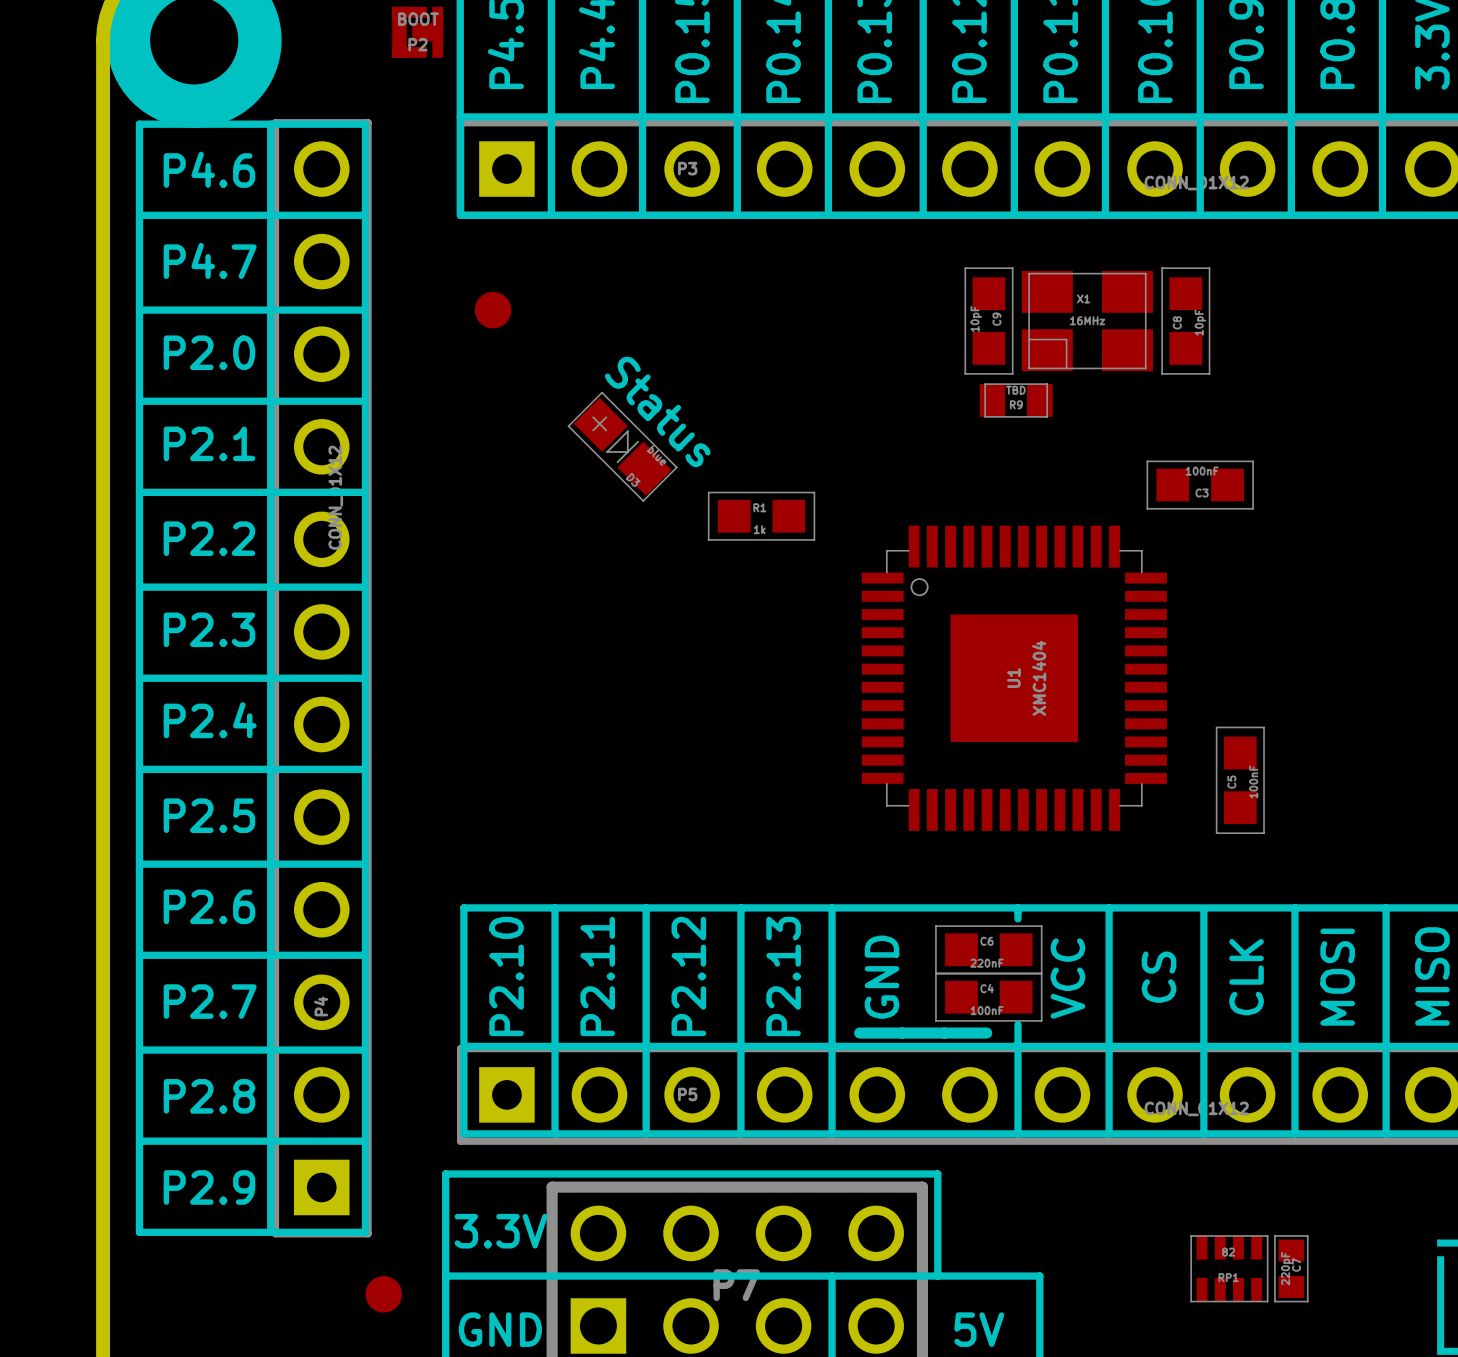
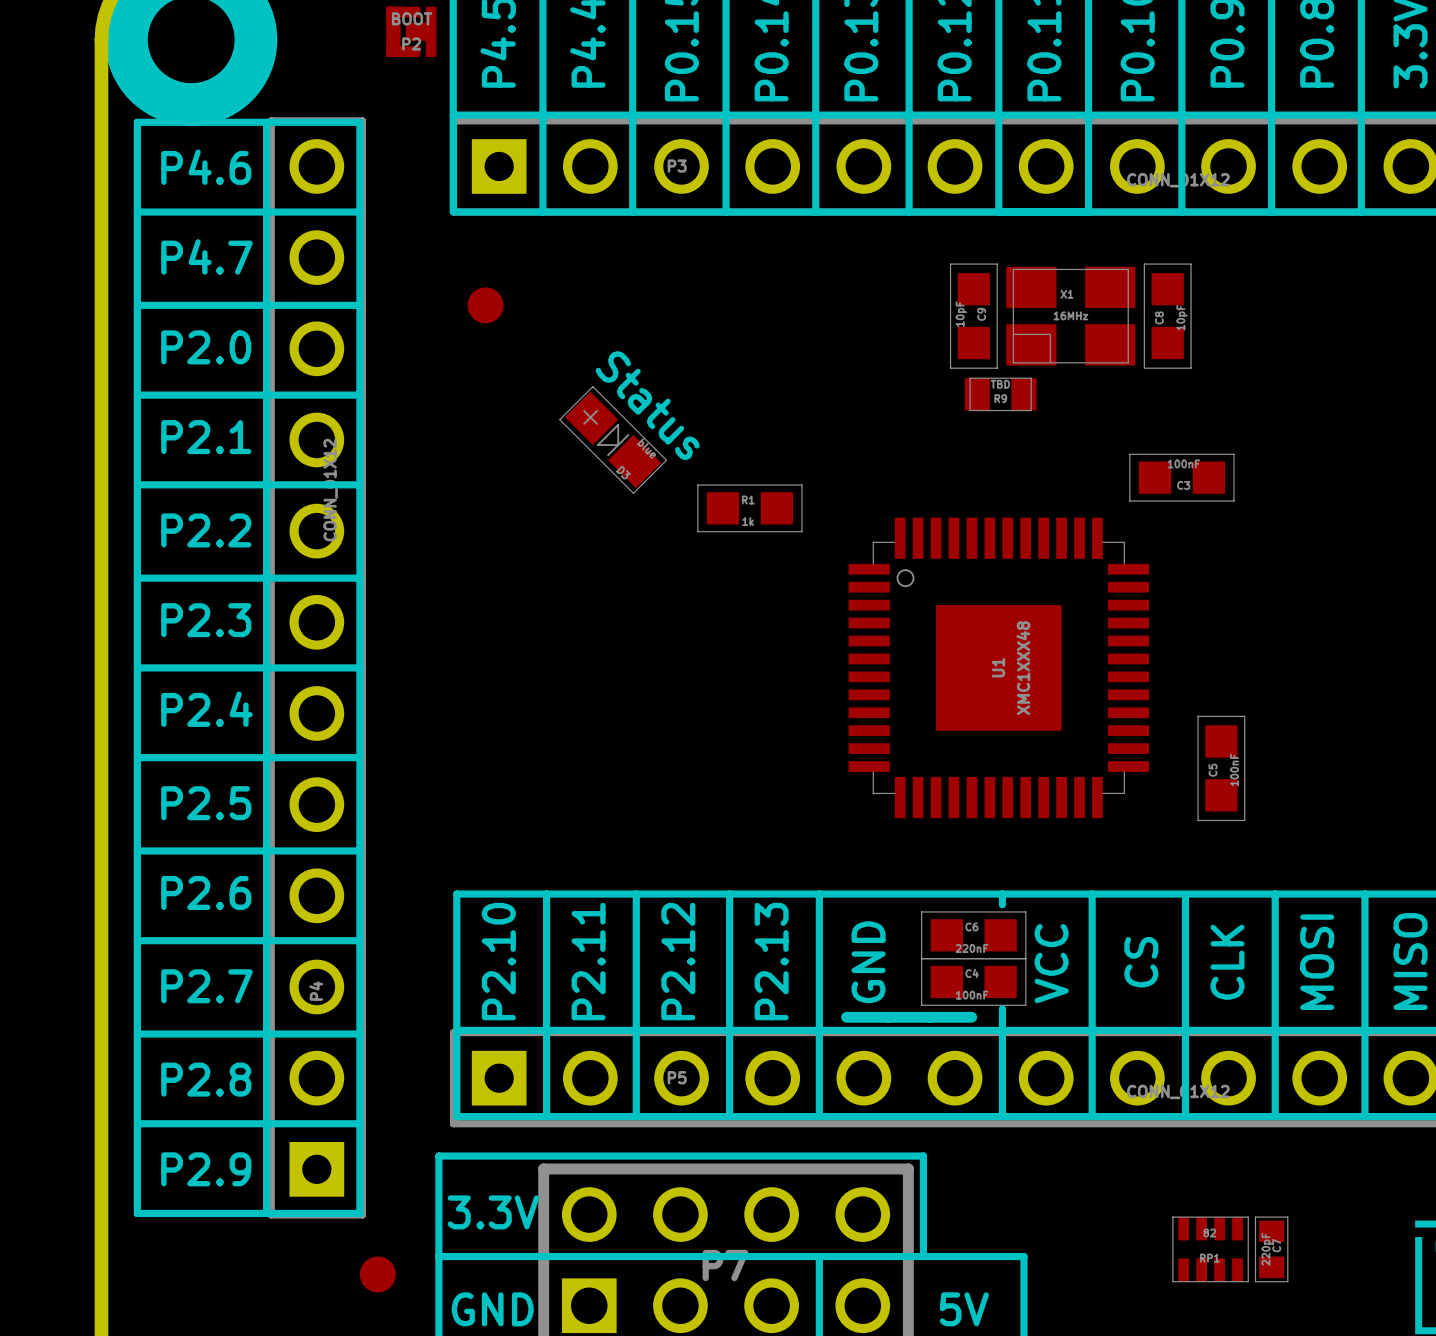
U1 value: XMC1404 (1039, 678) -> XMC1XXX48 (1023, 668)

